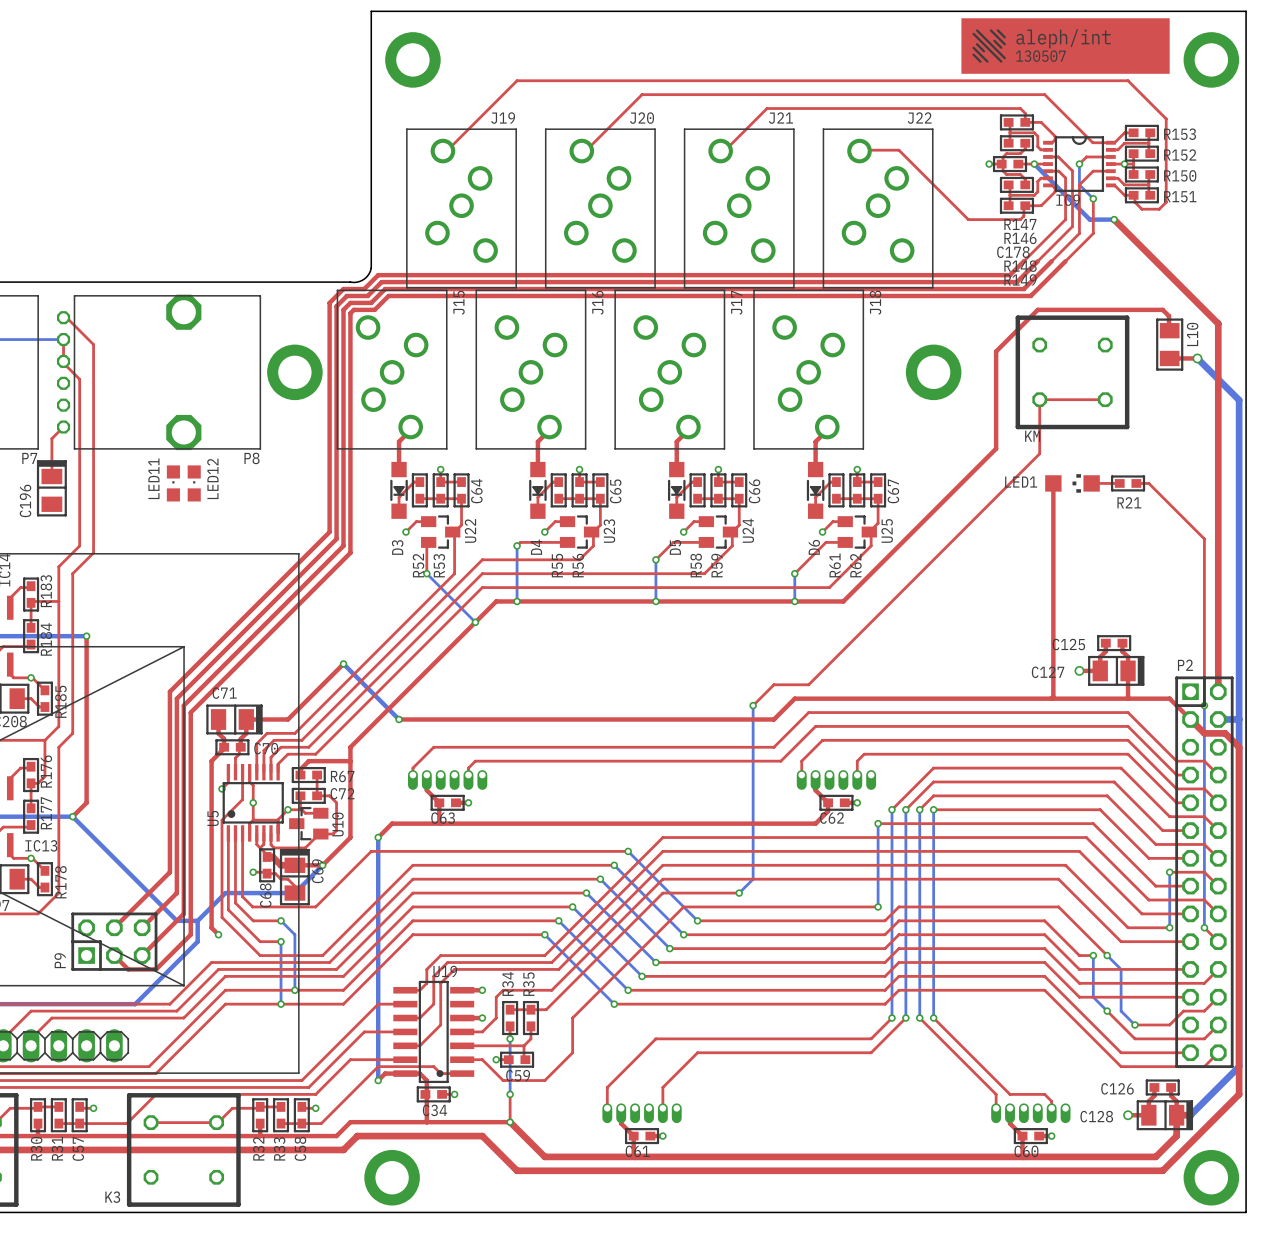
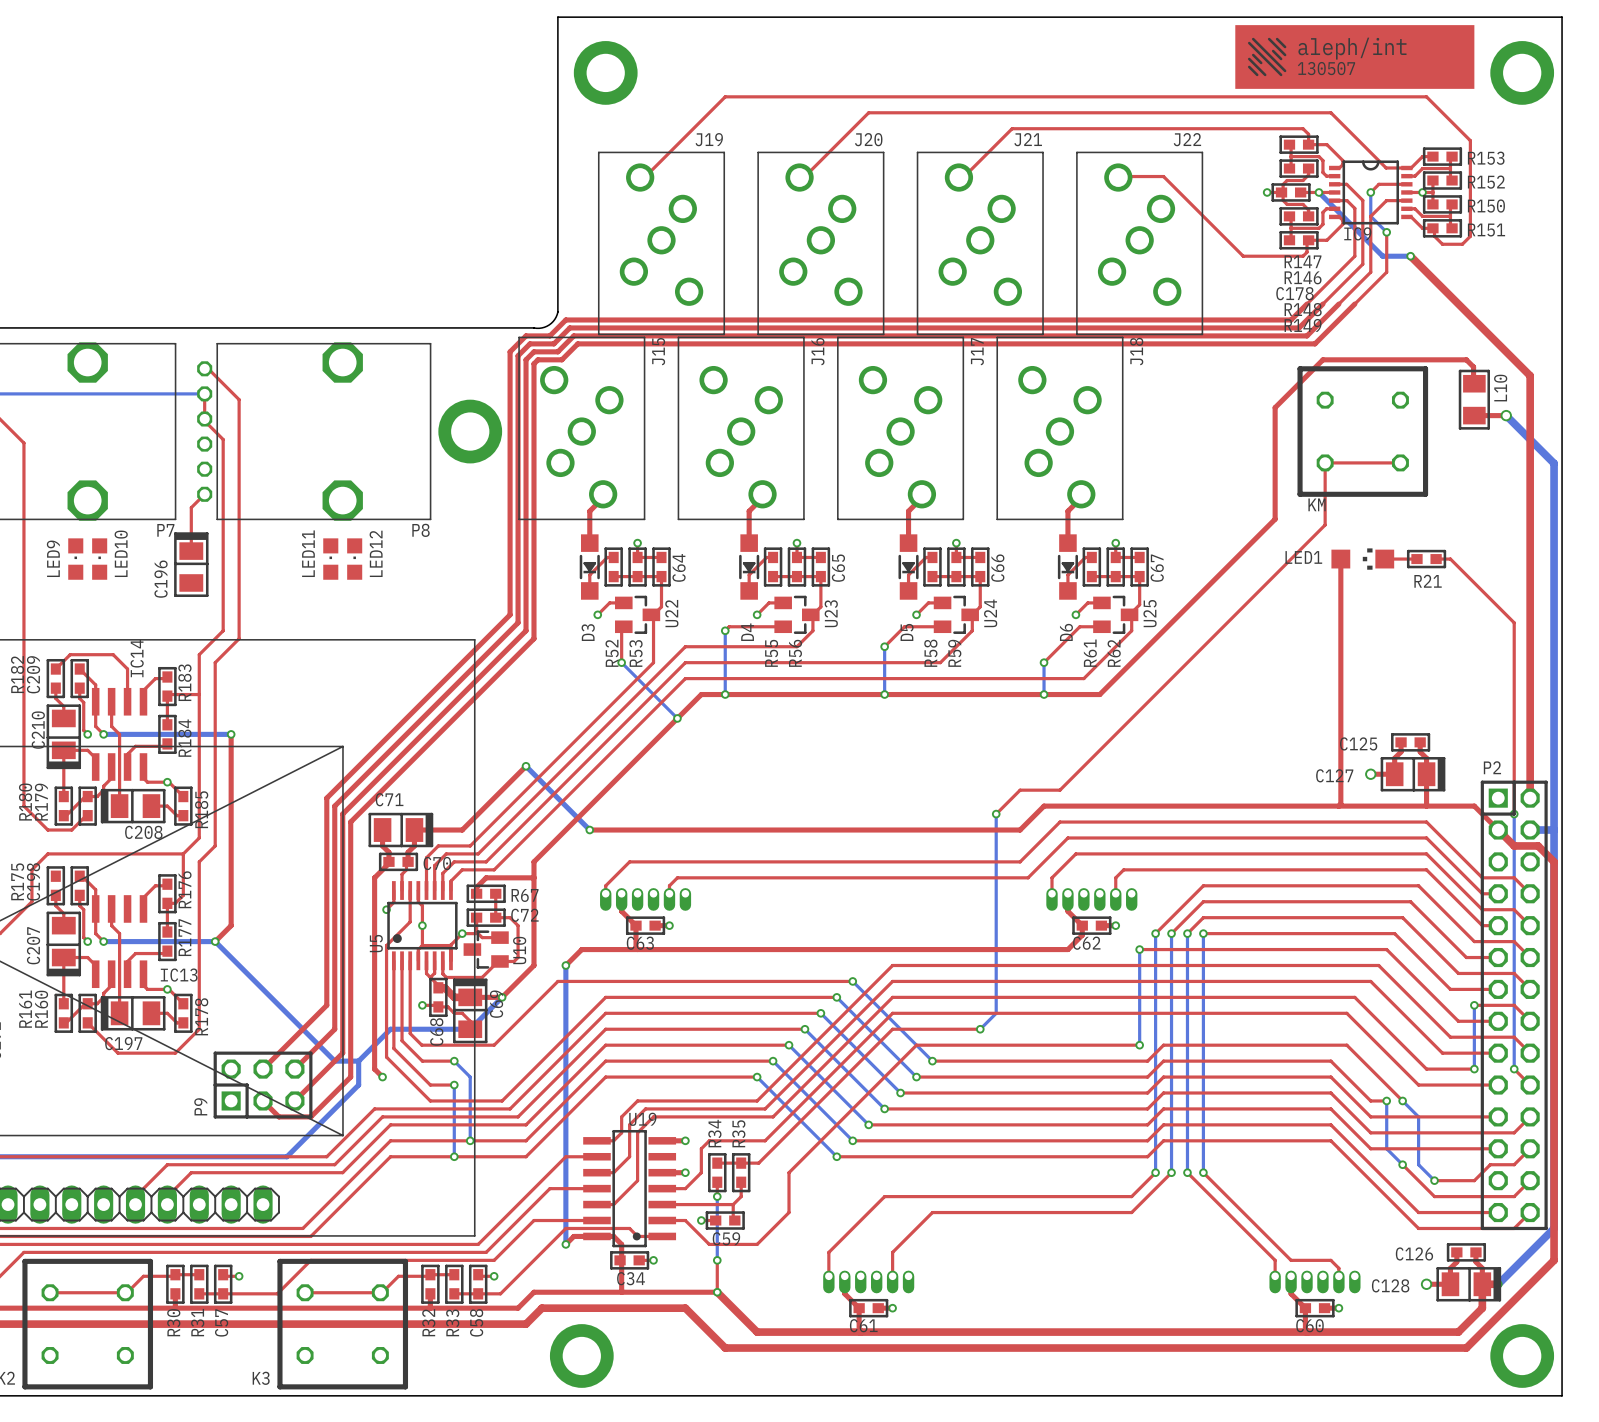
part: (933, 372) -> none

